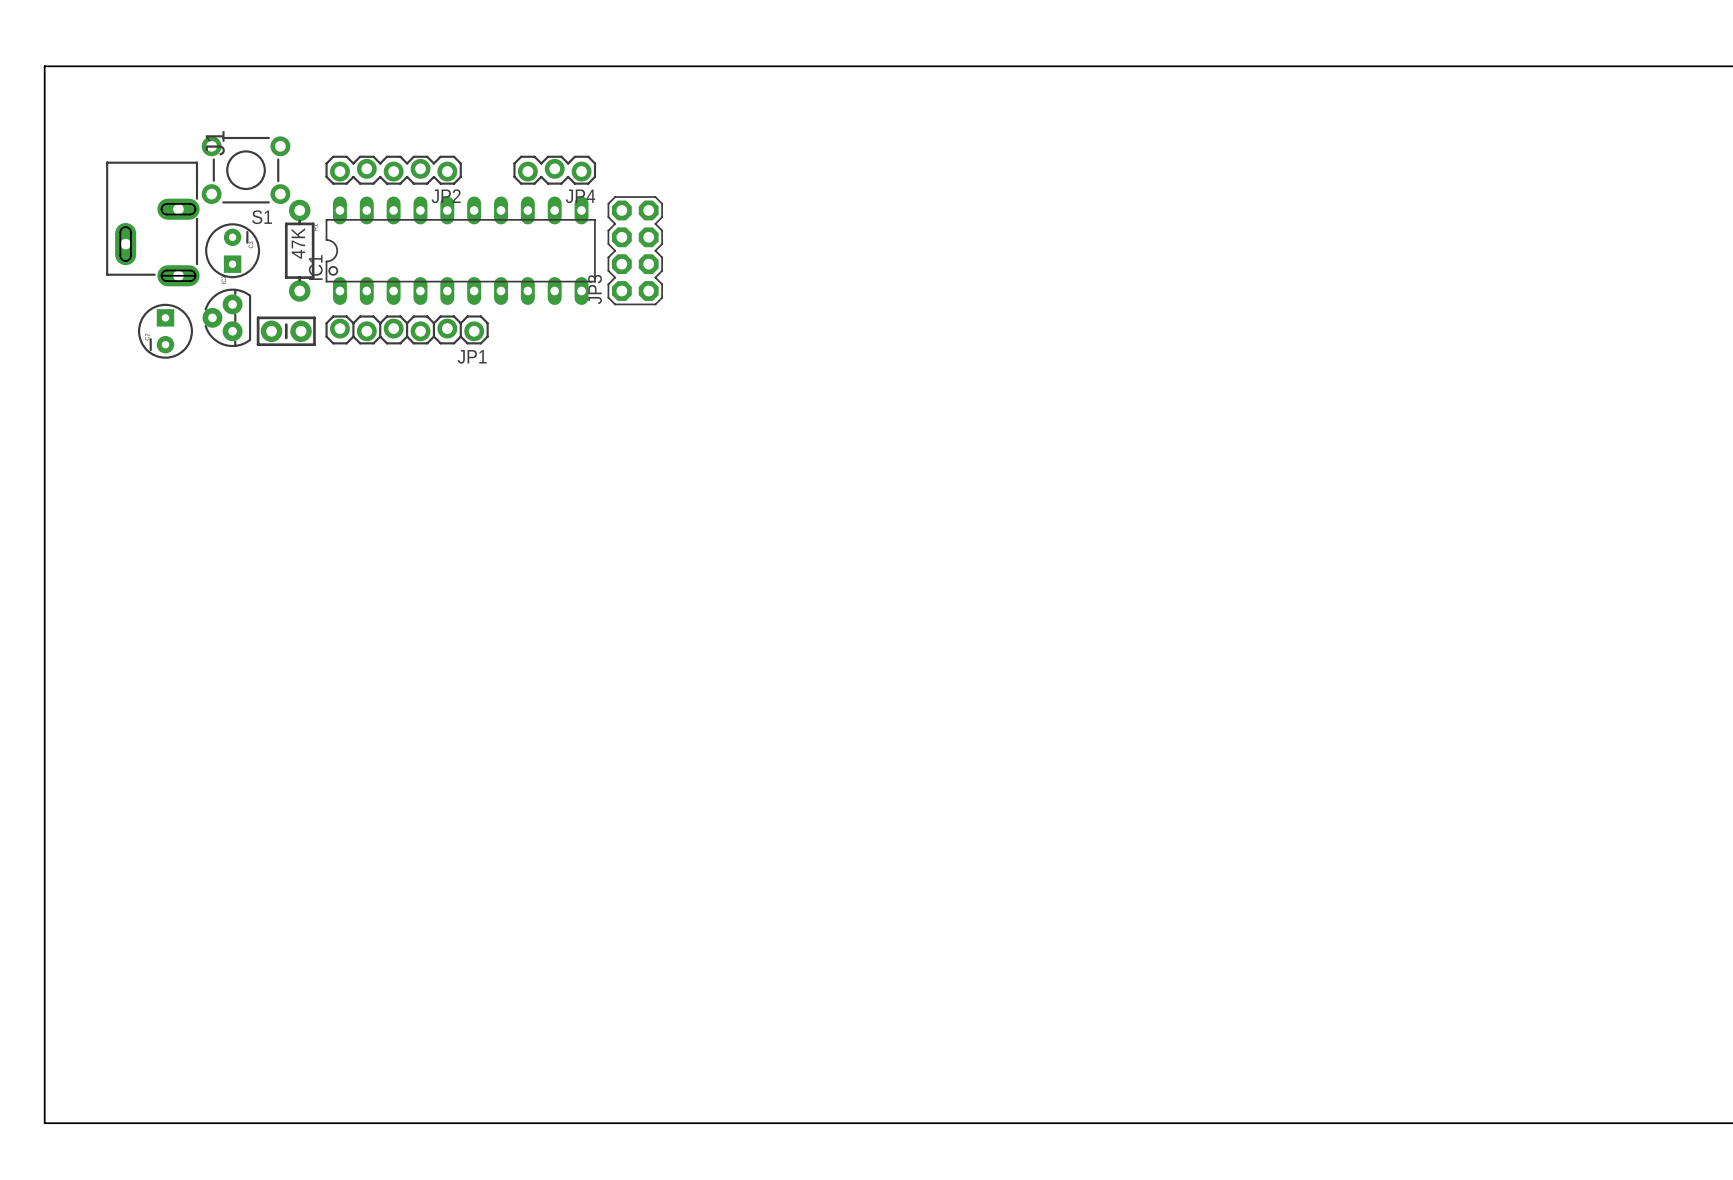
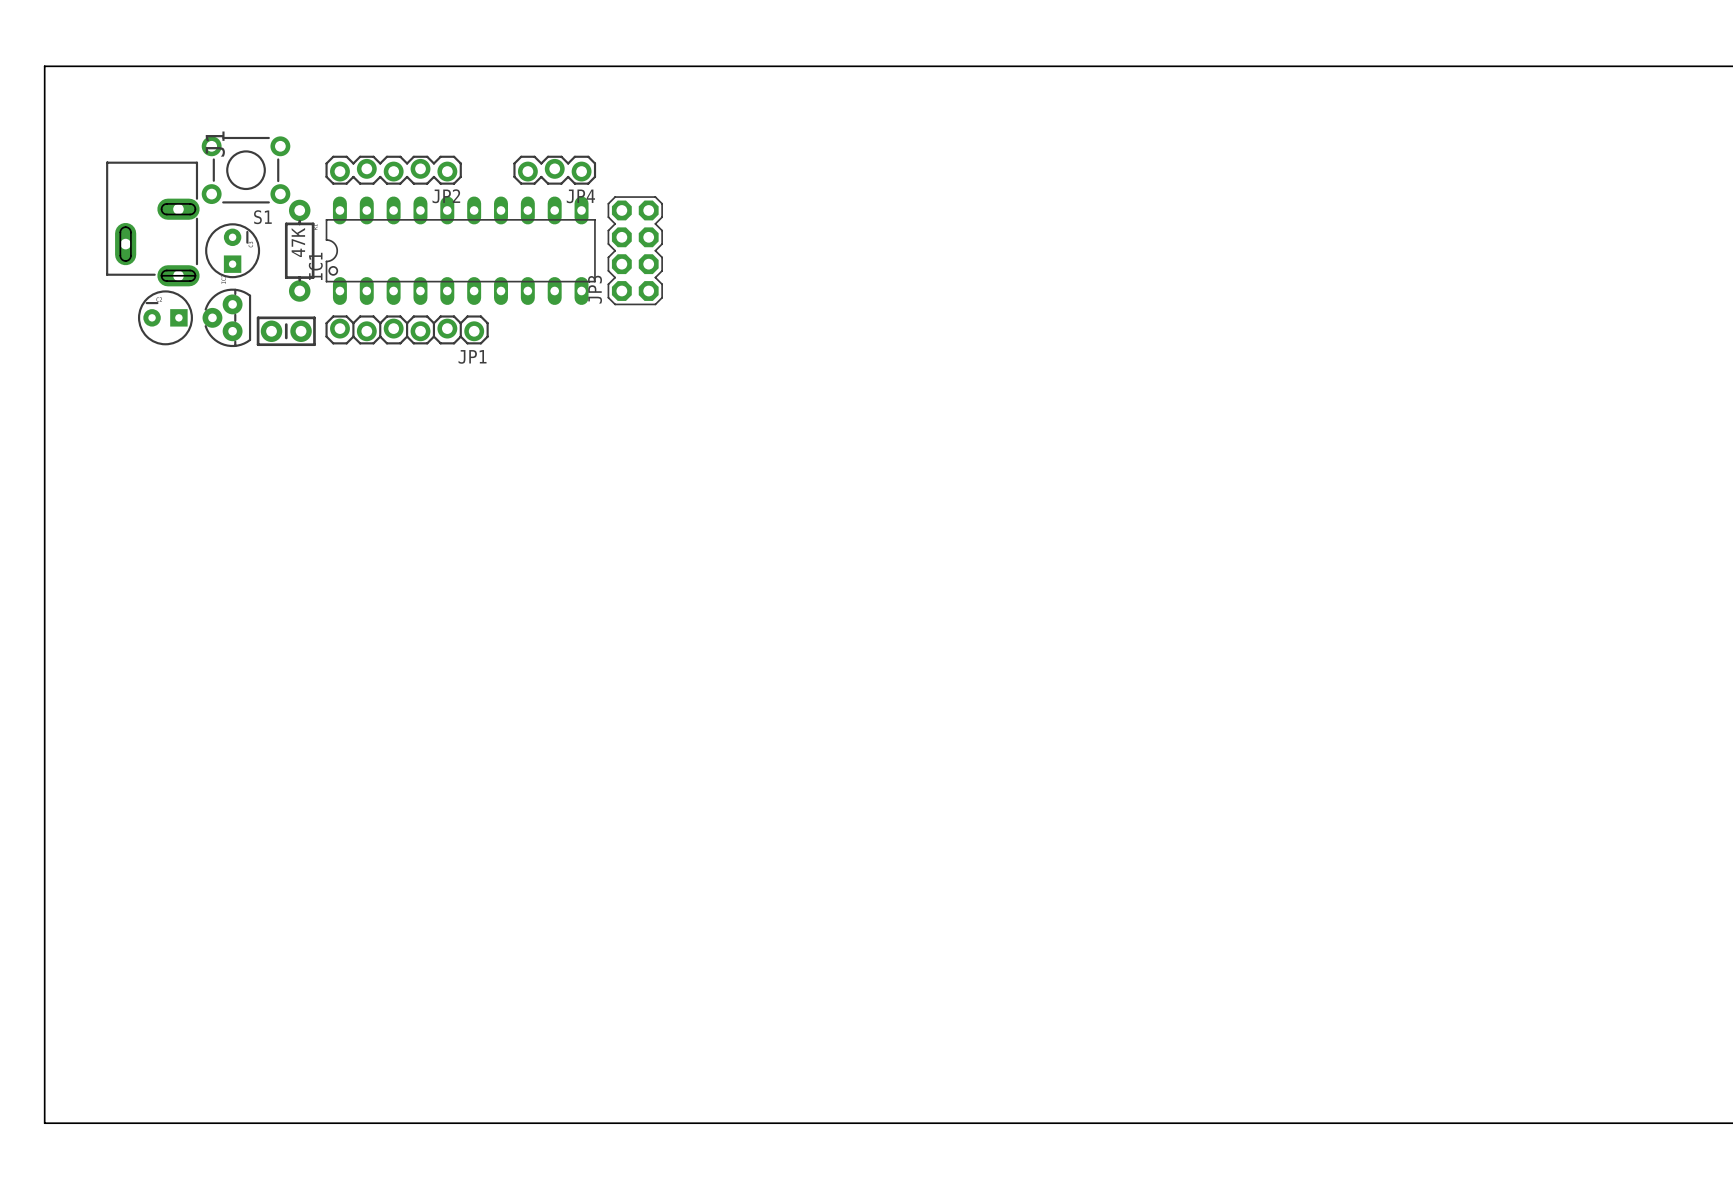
part rotation: 0° (165, 331) -> 90° clockwise (165, 317)

